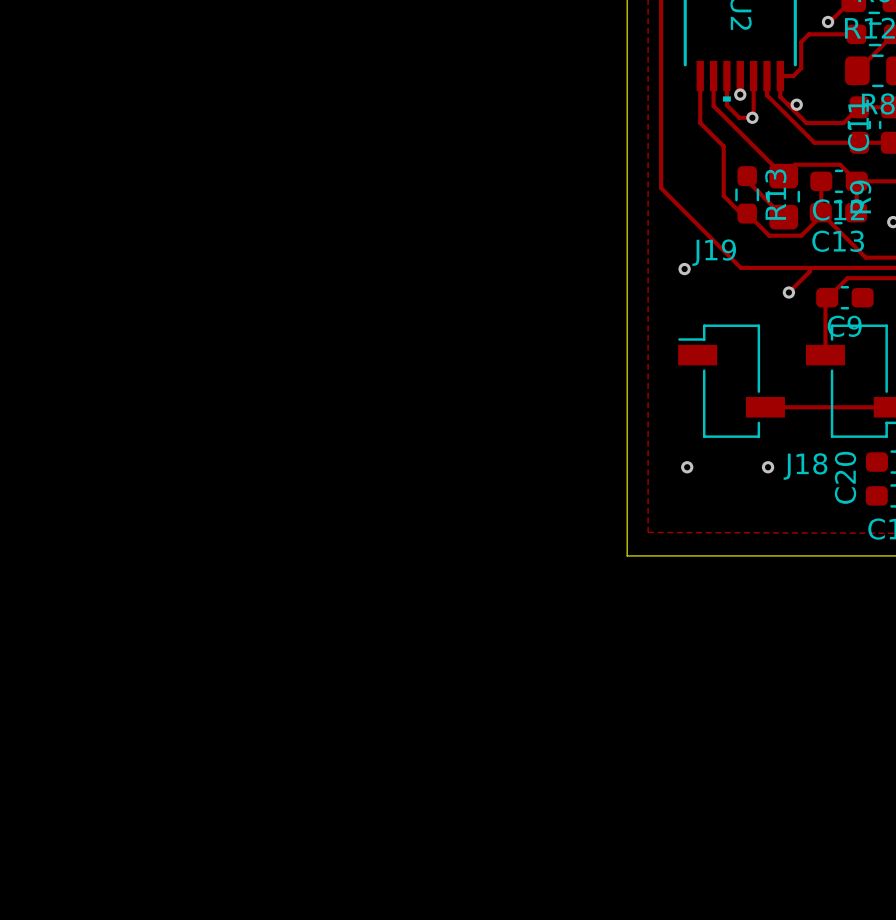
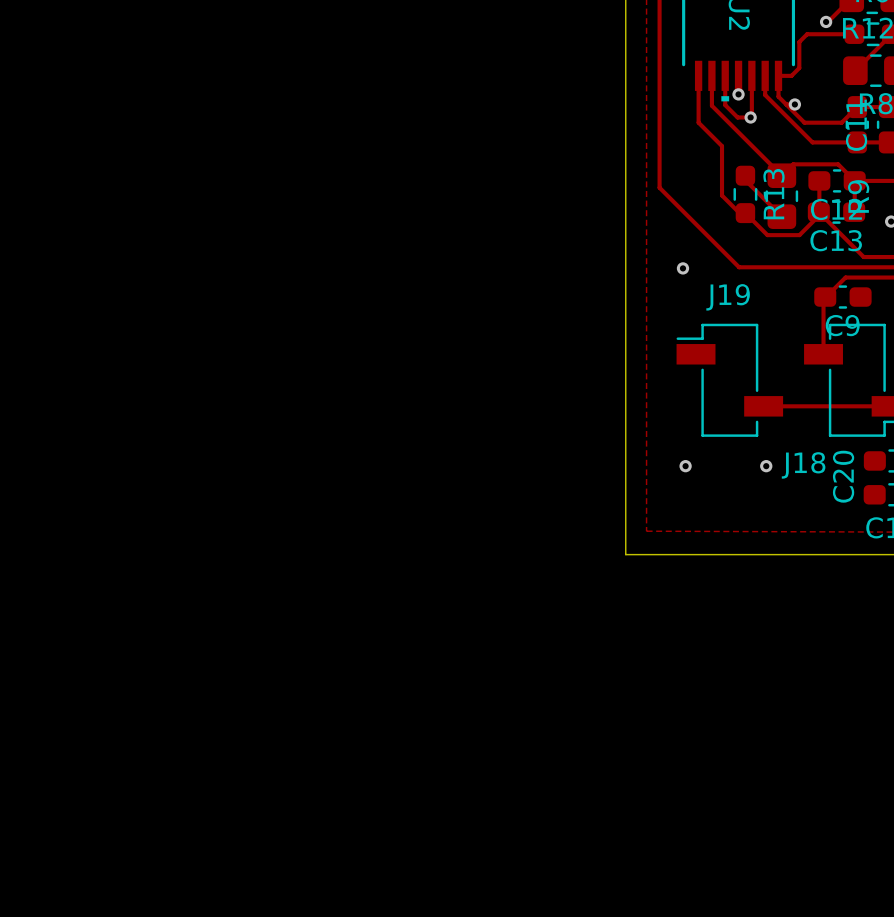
J19 name position: J19 (714, 252) -> J19 (728, 297)
track: (809, 267) (809, 271) (788, 292) -> none
via: (788, 292) -> none

